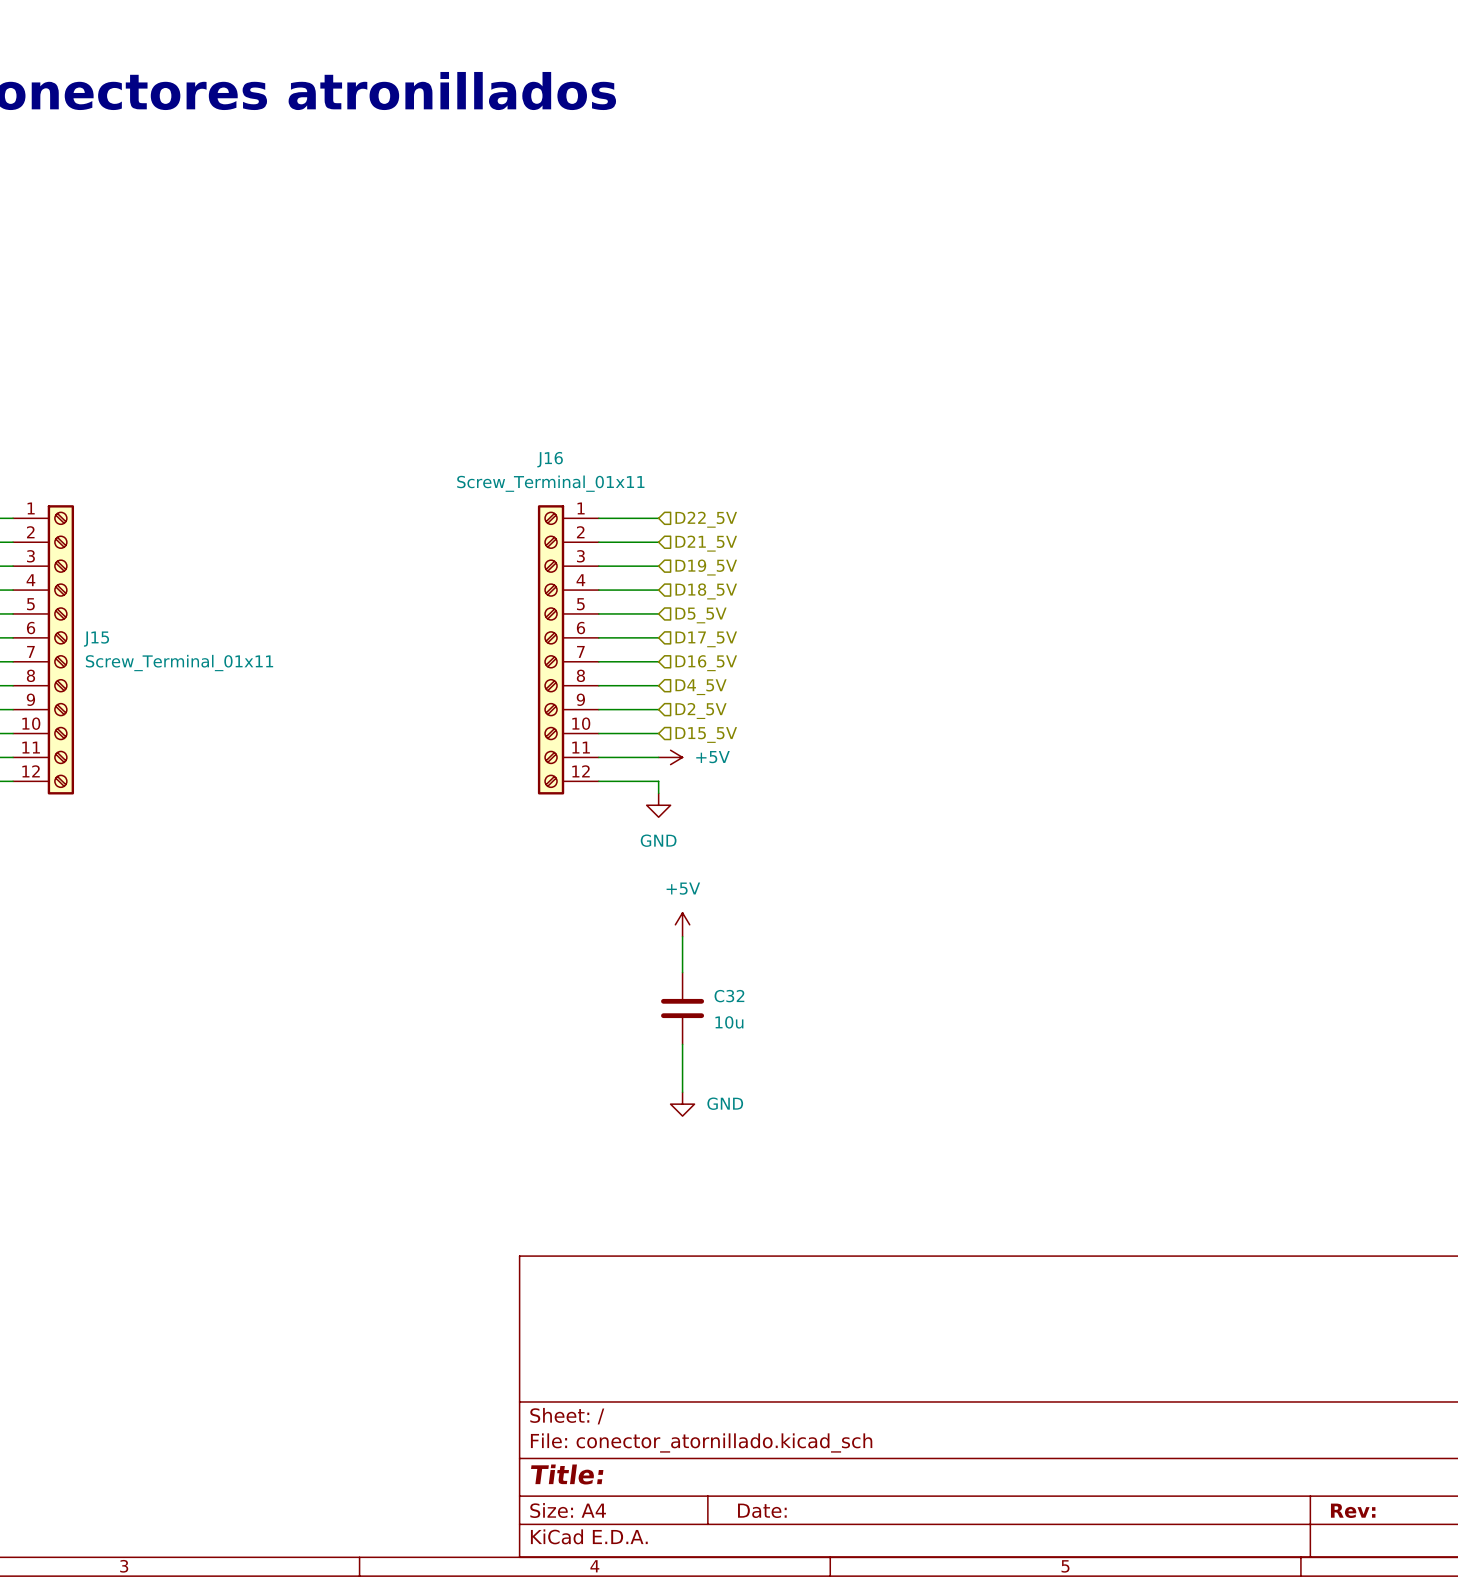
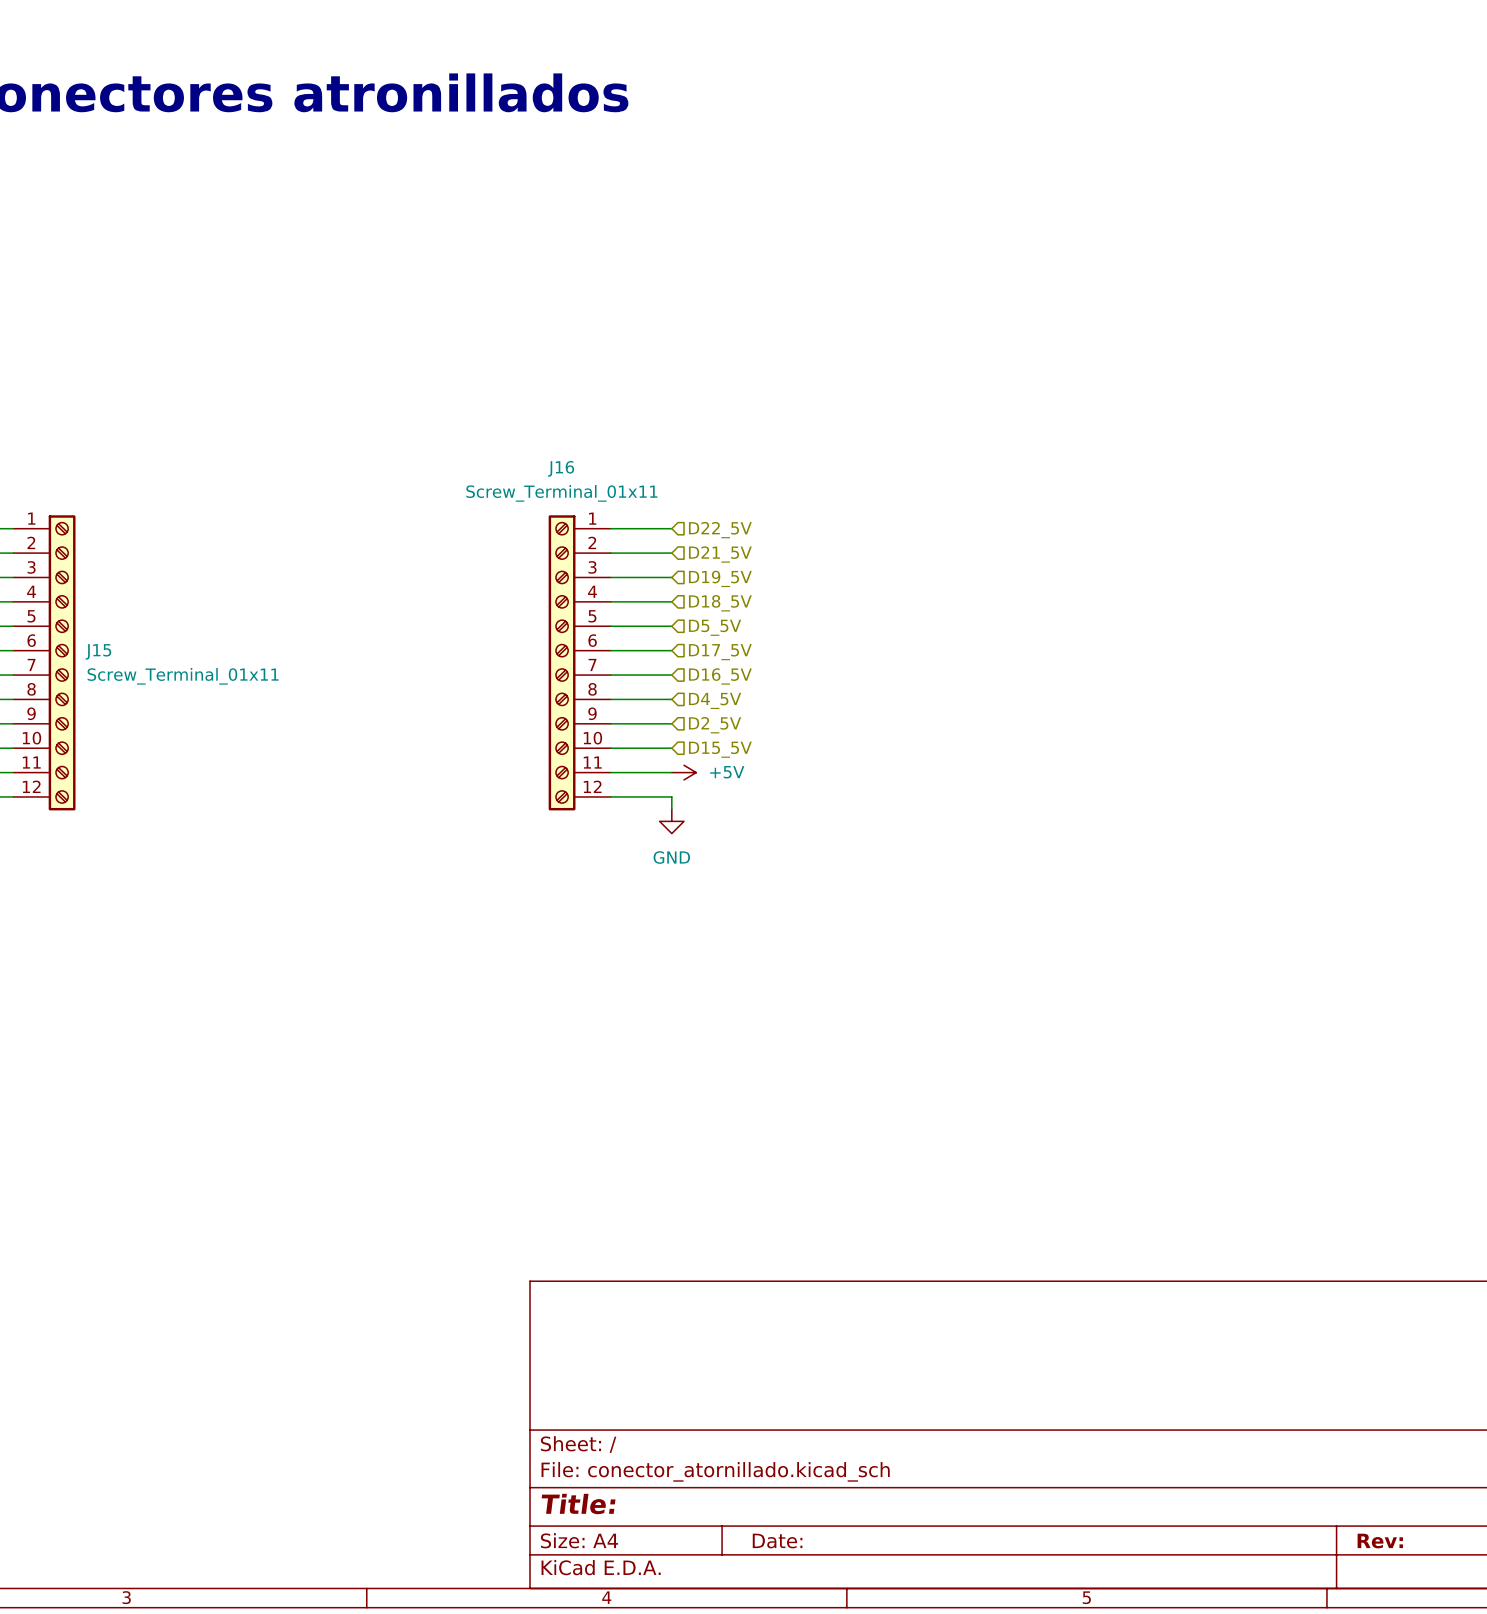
power symbol: +5V (682, 924) -> none
wire: (682, 936) (682, 972) -> none
C32: 10u (682, 1008) -> none
wire: (682, 1044) (682, 1092) -> none
power symbol: GND (682, 1104) -> none

